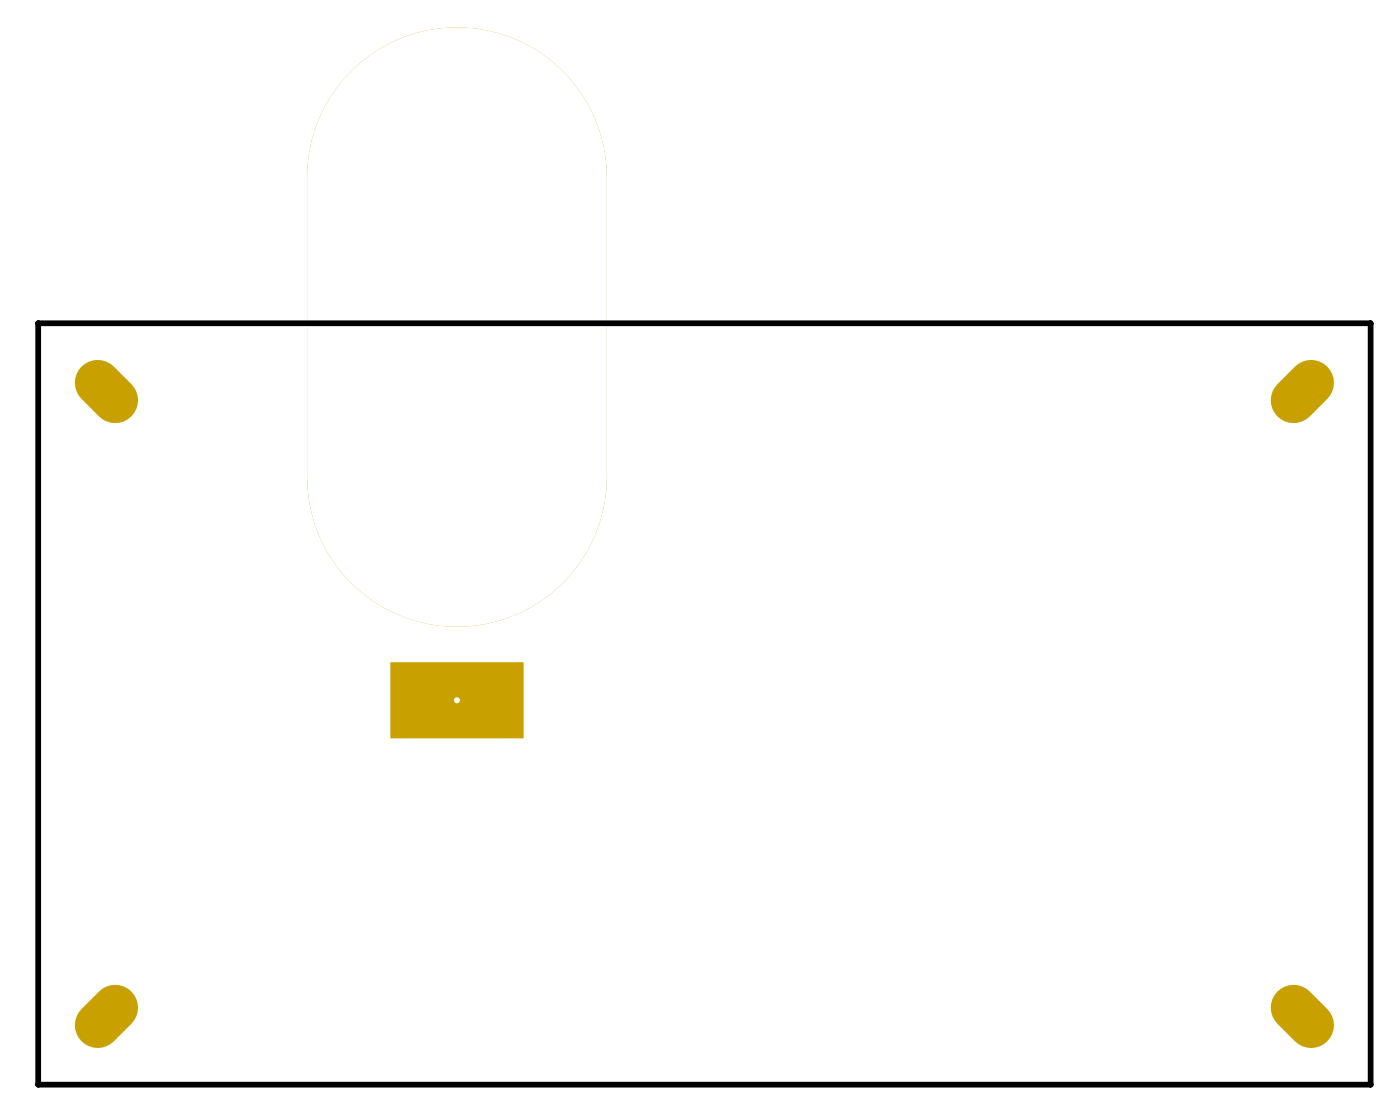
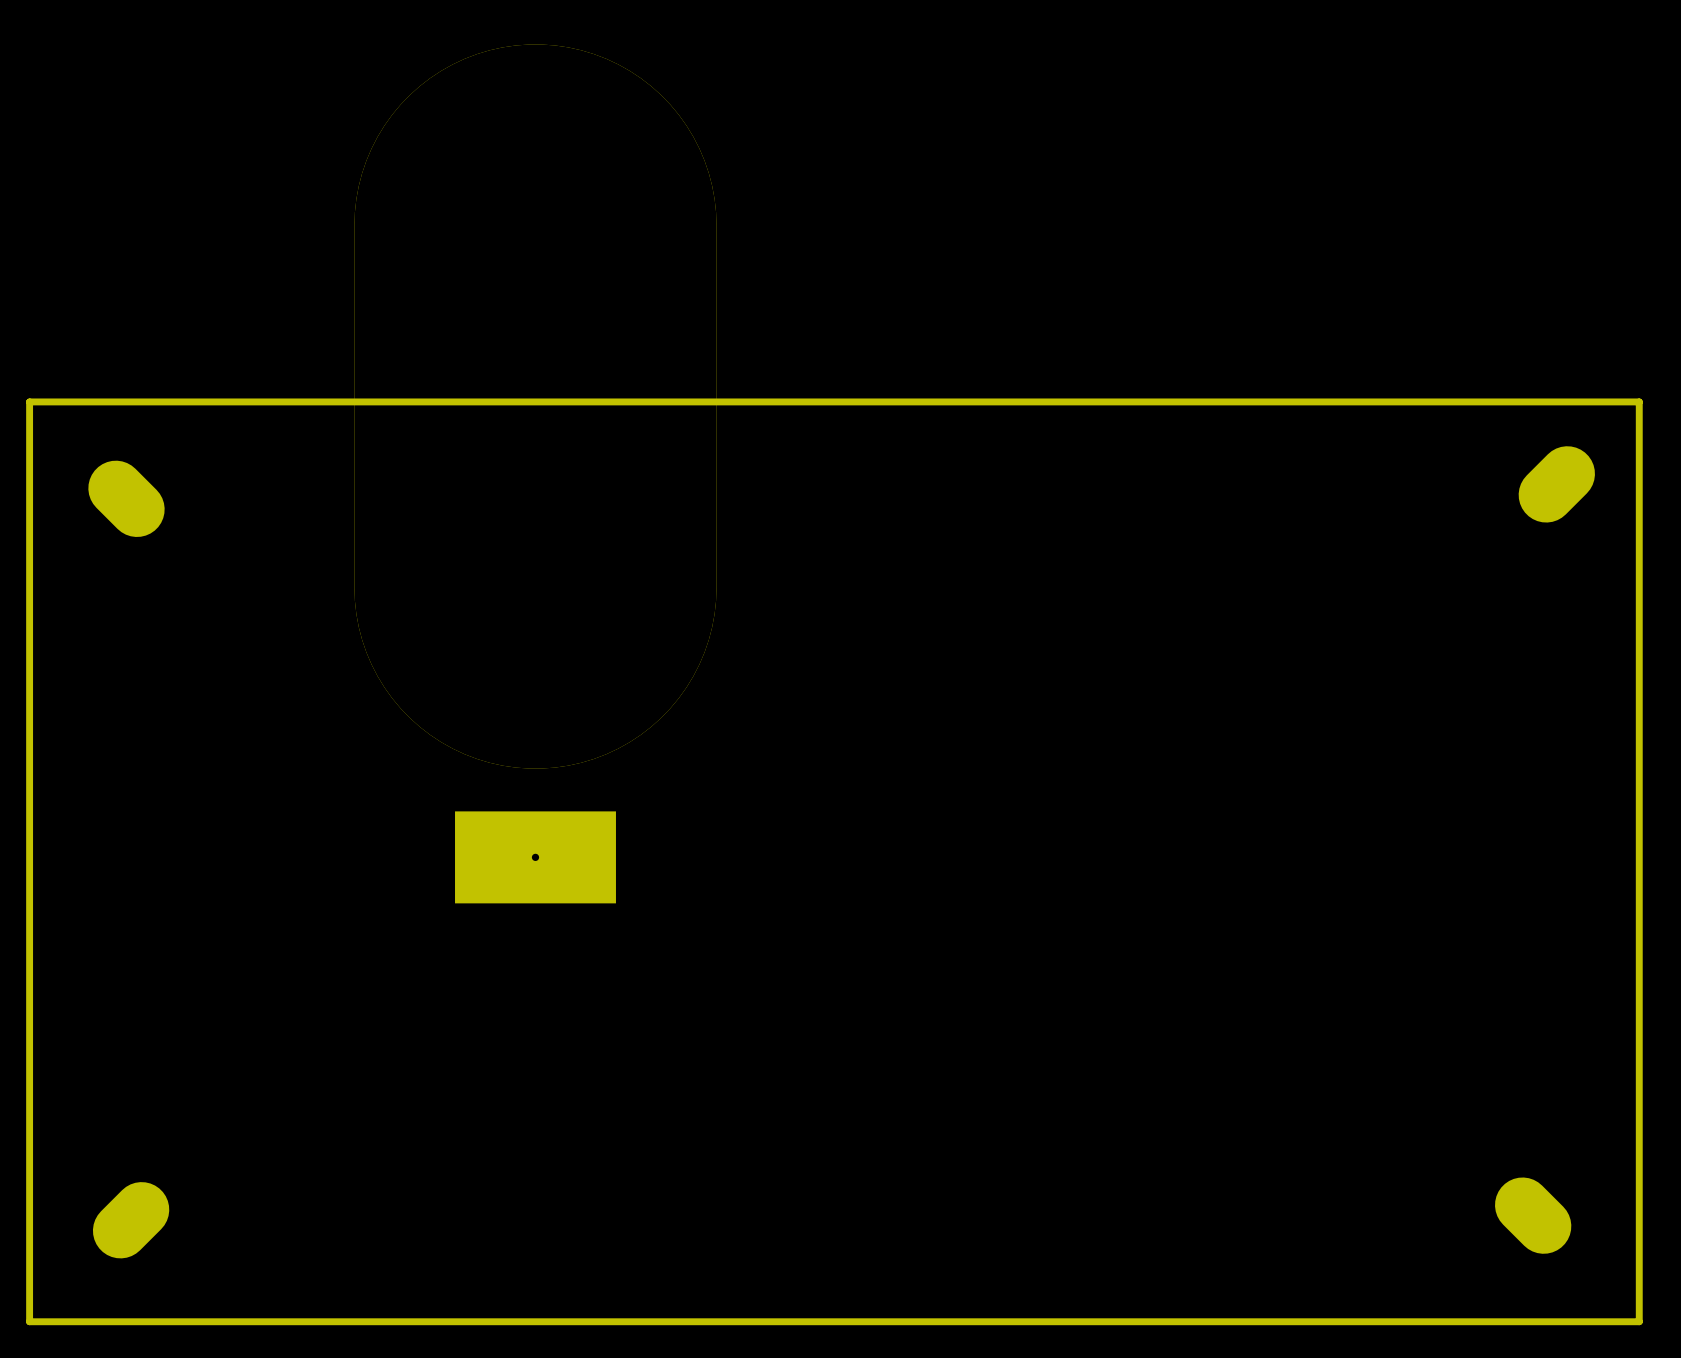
part position: (106, 391) -> (126, 498)
part position: (106, 1016) -> (131, 1220)
part position: (1302, 1016) -> (1533, 1215)

